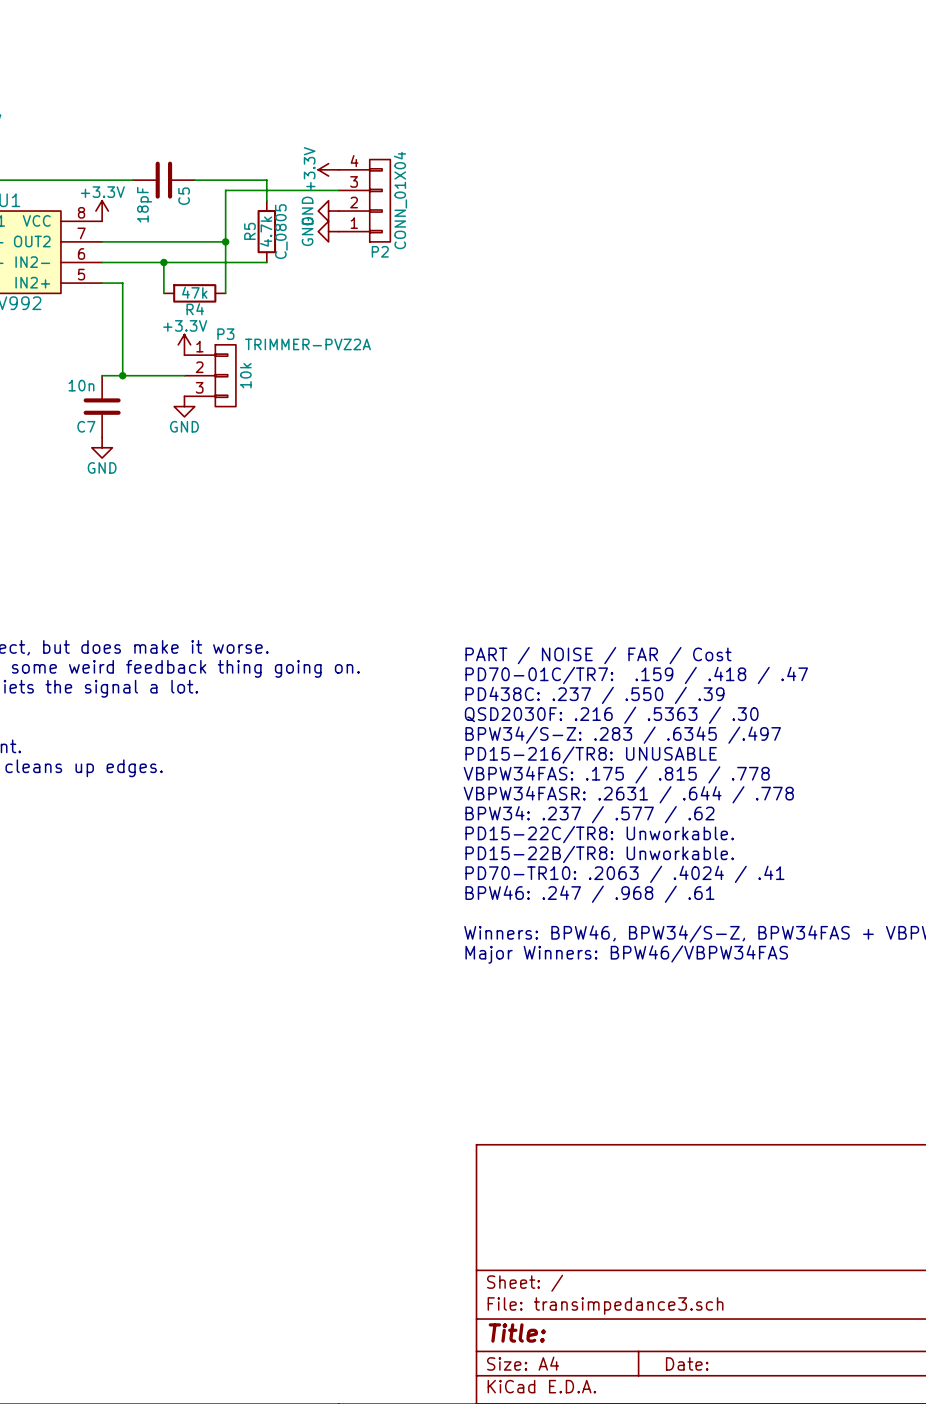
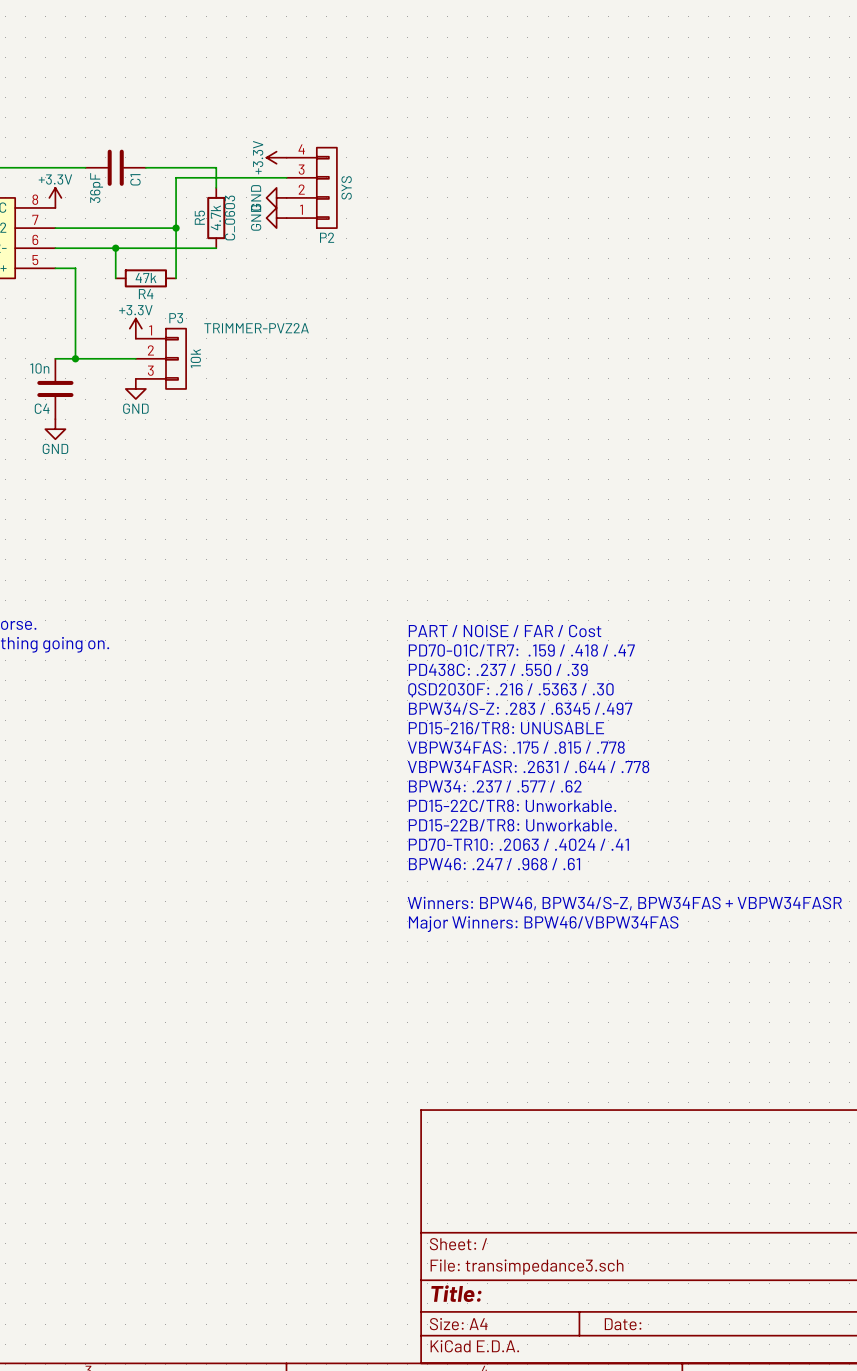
C5 name: C5 (184, 196) -> C1 (135, 179)
P2 value: CONN_01X04 (400, 200) -> SYS (346, 187)
C5 value: 18pF (144, 204) -> 36pF (96, 188)
R5 text: C_0805 (281, 231) -> C_0603 (229, 217)
C7 name: C7 (86, 426) -> C4 (42, 408)

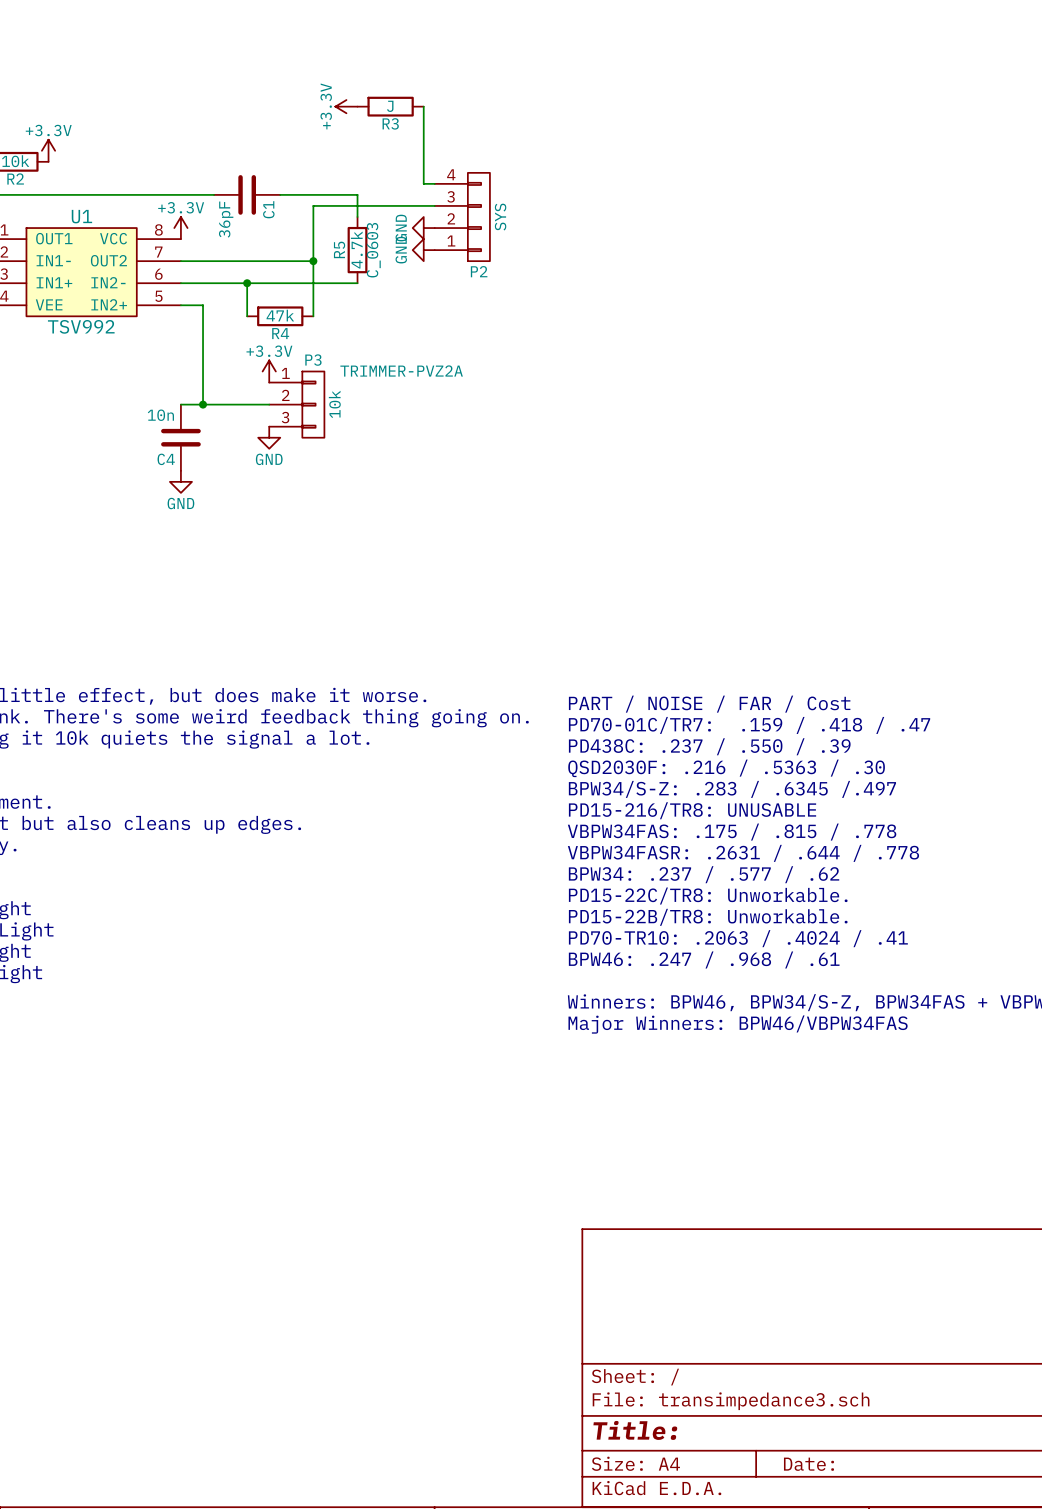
R3: none -> J (390, 106)
wire: none -> (423, 106) (423, 183) (434, 183)
power symbol position: +3.3V (276, 157) -> +3.3V (346, 106)

